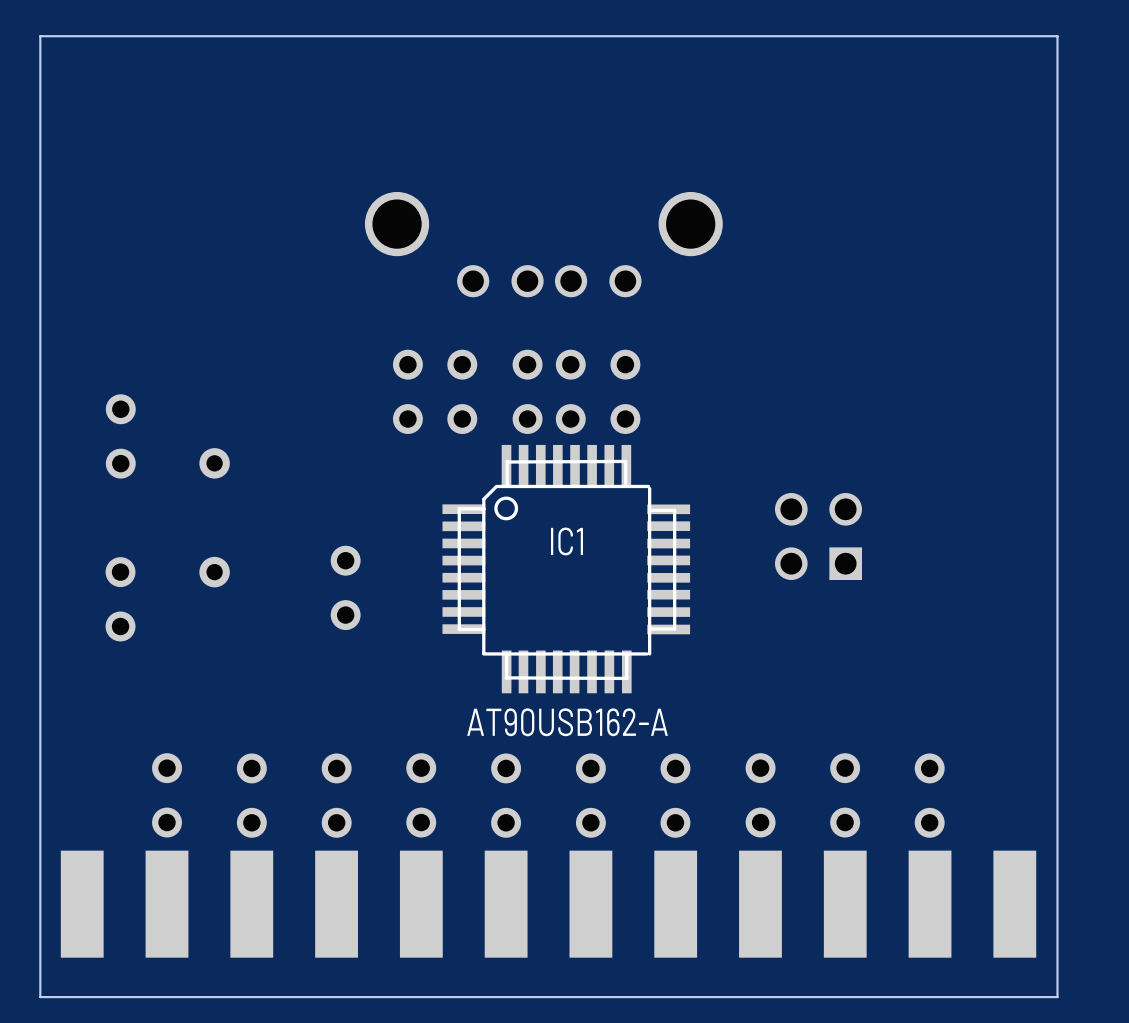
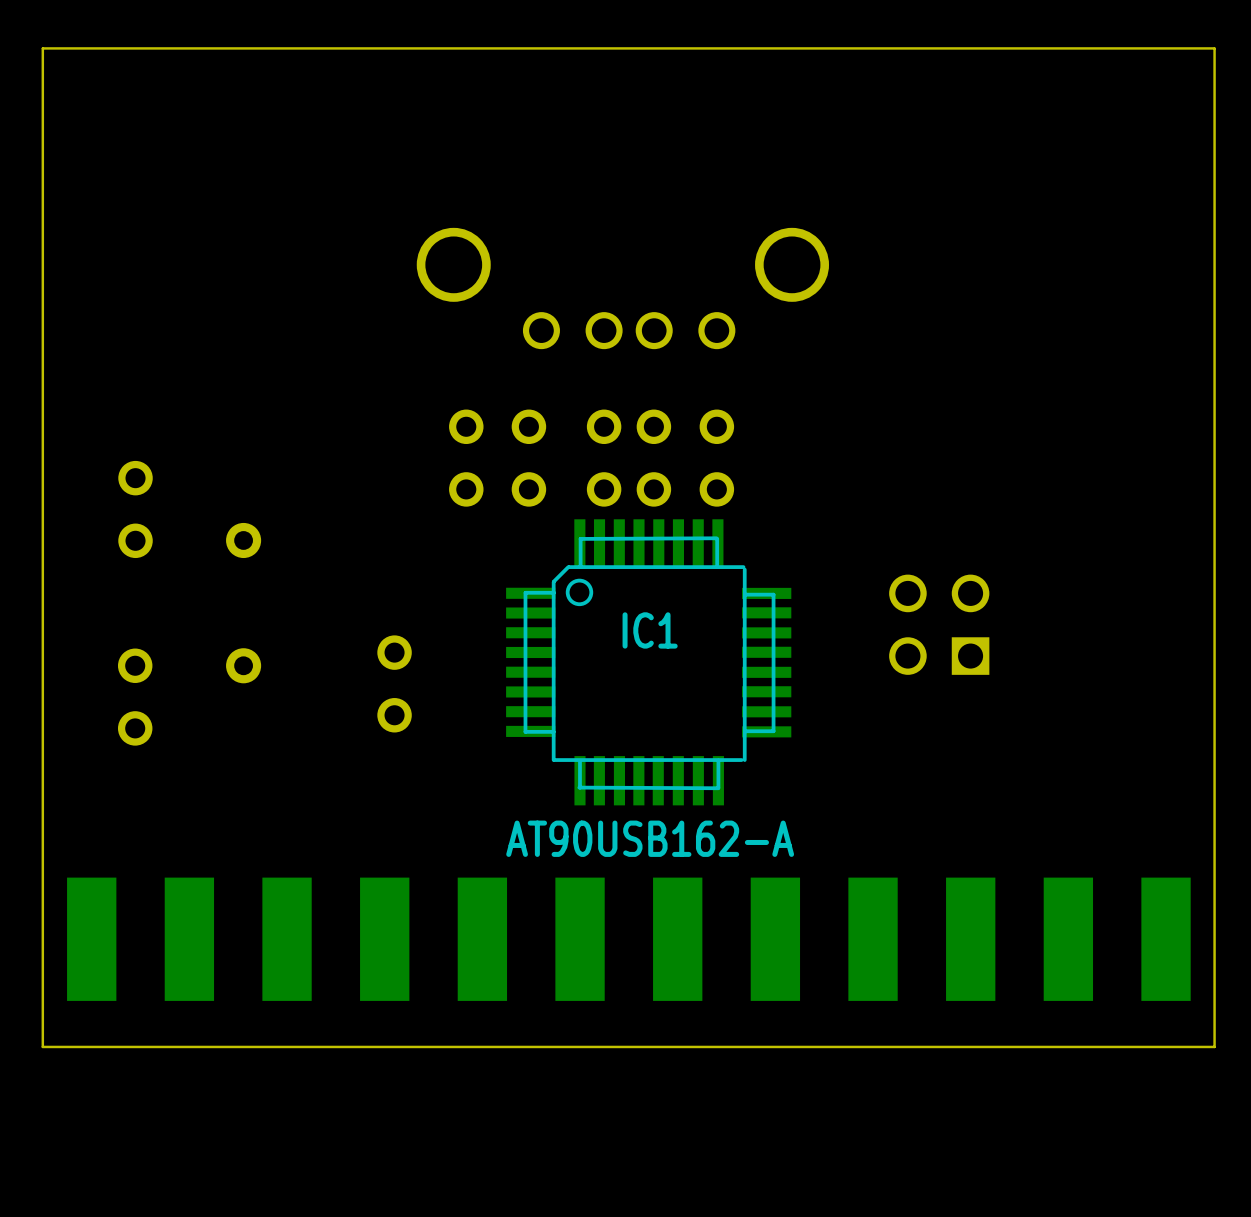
part: (167, 795) -> none
part: (251, 795) -> none
part: (336, 795) -> none
part: (421, 795) -> none
part: (506, 795) -> none
part: (590, 795) -> none
part: (675, 795) -> none
part: (760, 795) -> none
part: (845, 795) -> none
part: (929, 795) -> none
board edge: (1057, 903) (1057, 997) (40, 997) (40, 903) -> (1214, 1046) (42, 1046)
part position: (548, 904) -> (628, 939)

